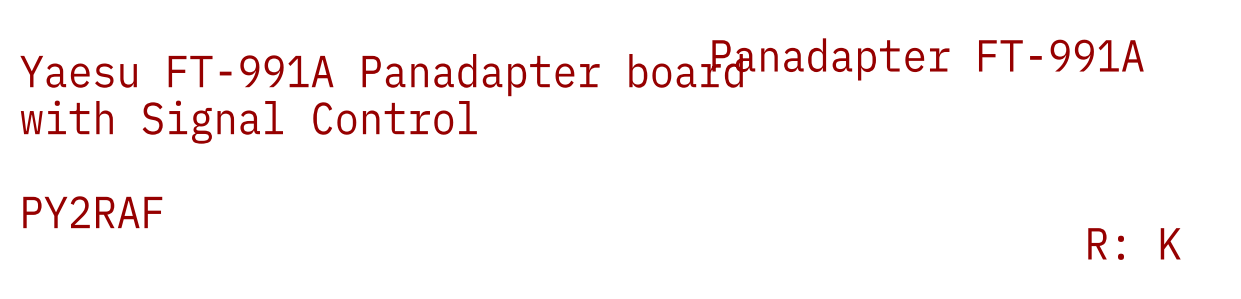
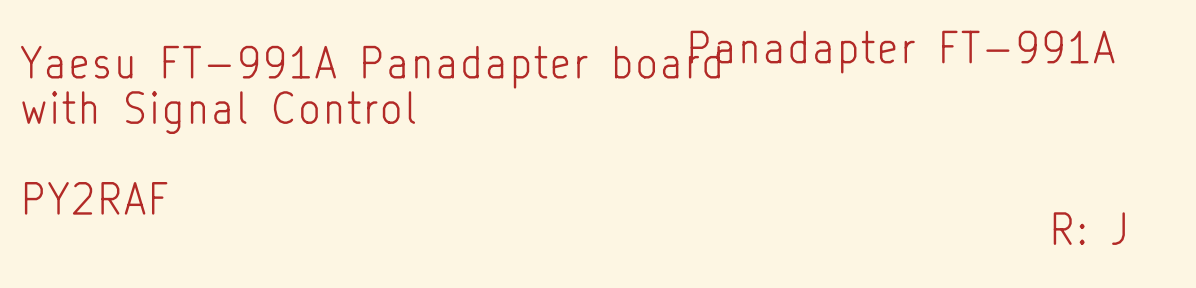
text: R: K (1134, 244) -> R: J (1089, 228)

